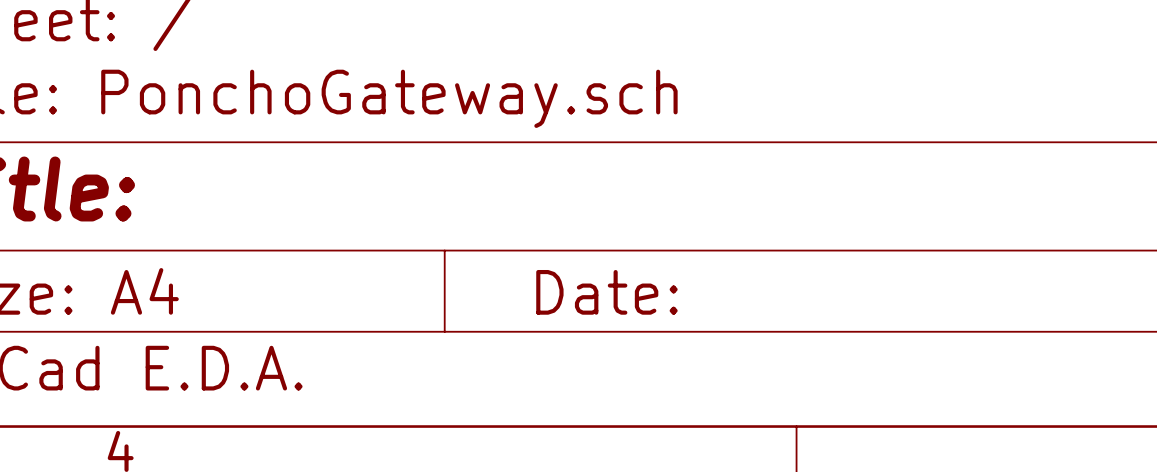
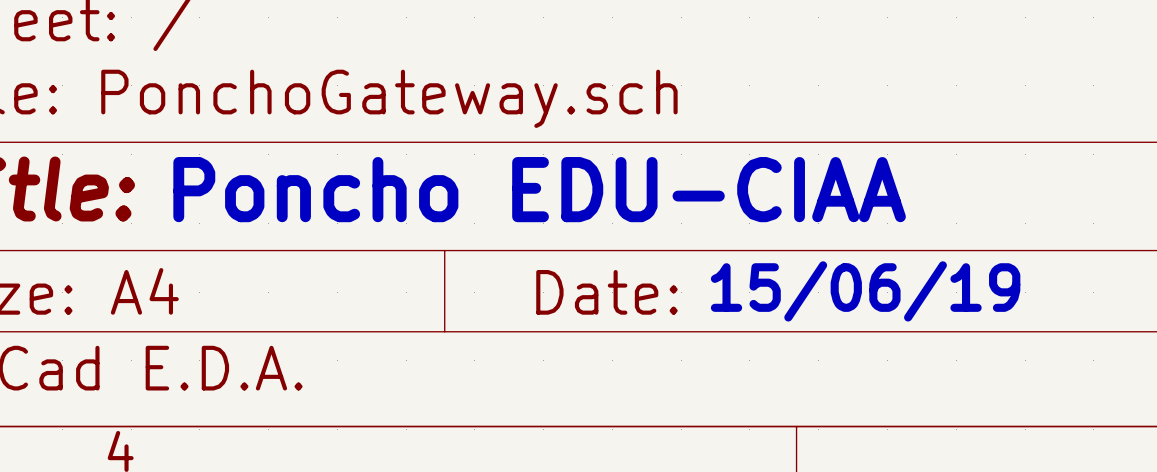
text: none -> Poncho EDU-CIAA (539, 189)
text: none -> 15/06/19 (865, 291)

